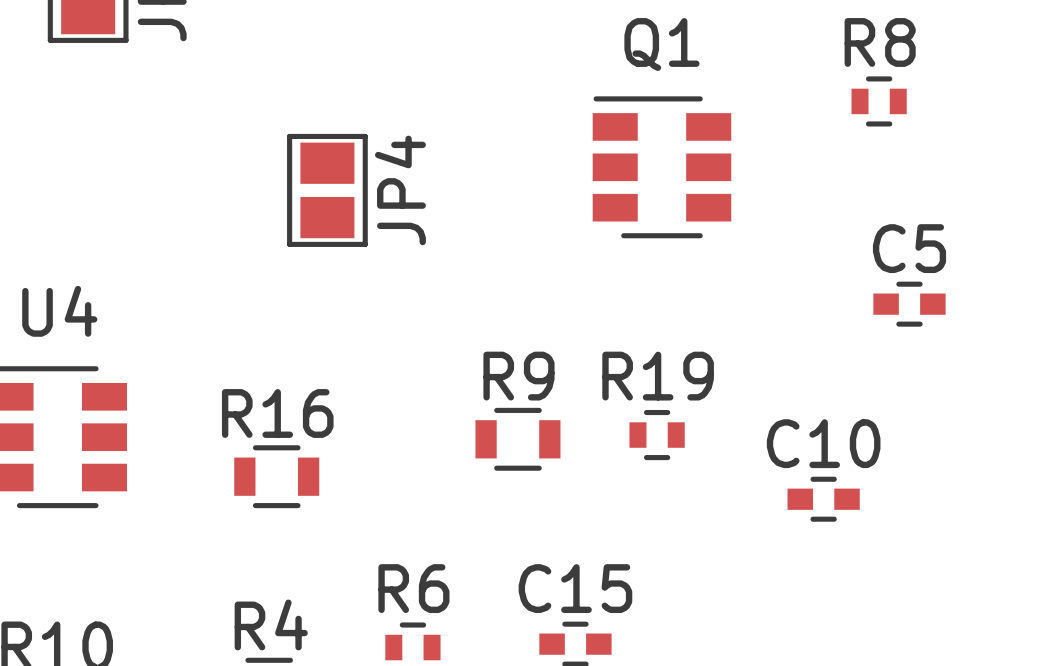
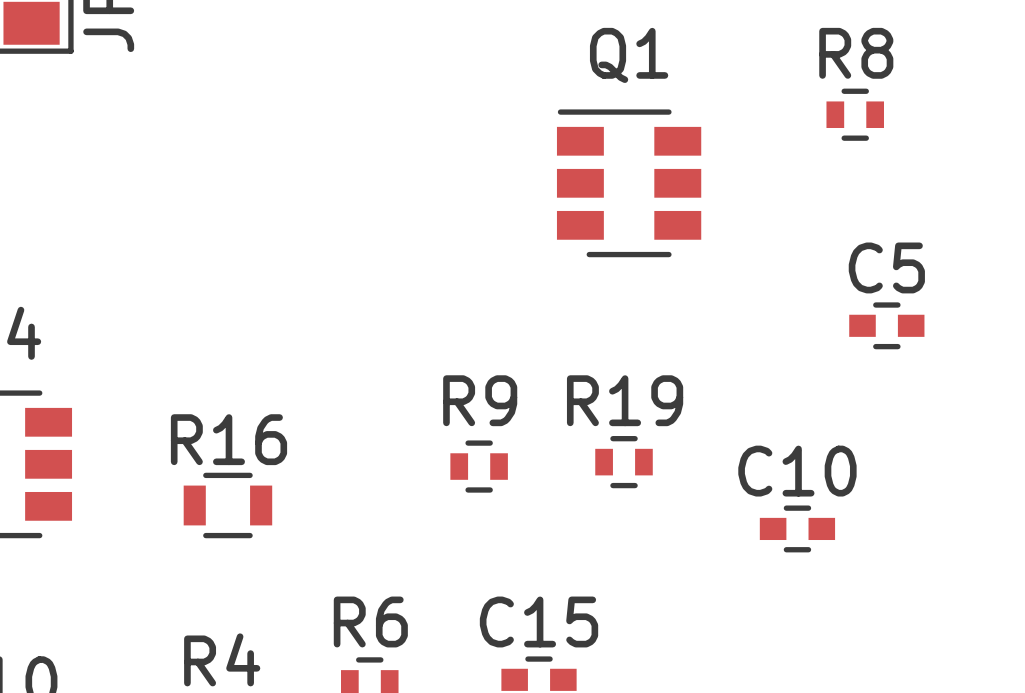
JP4: (327, 190) -> none
R9 footprint: [475, 407, 561, 471] -> [450, 440, 508, 493]

